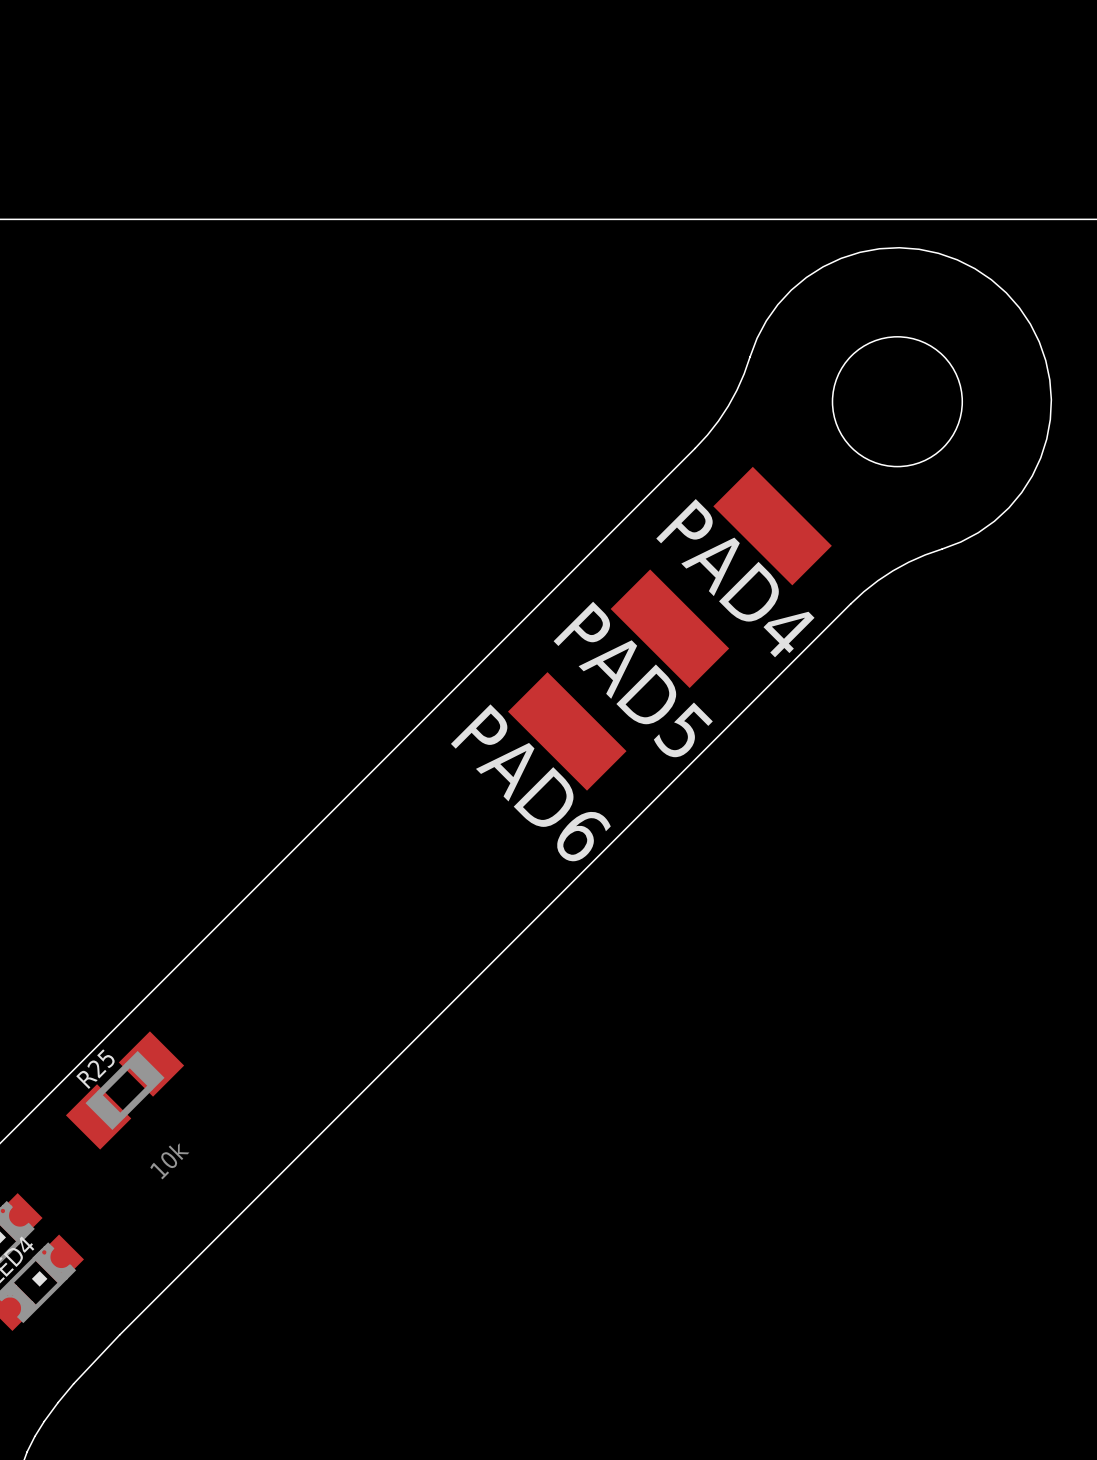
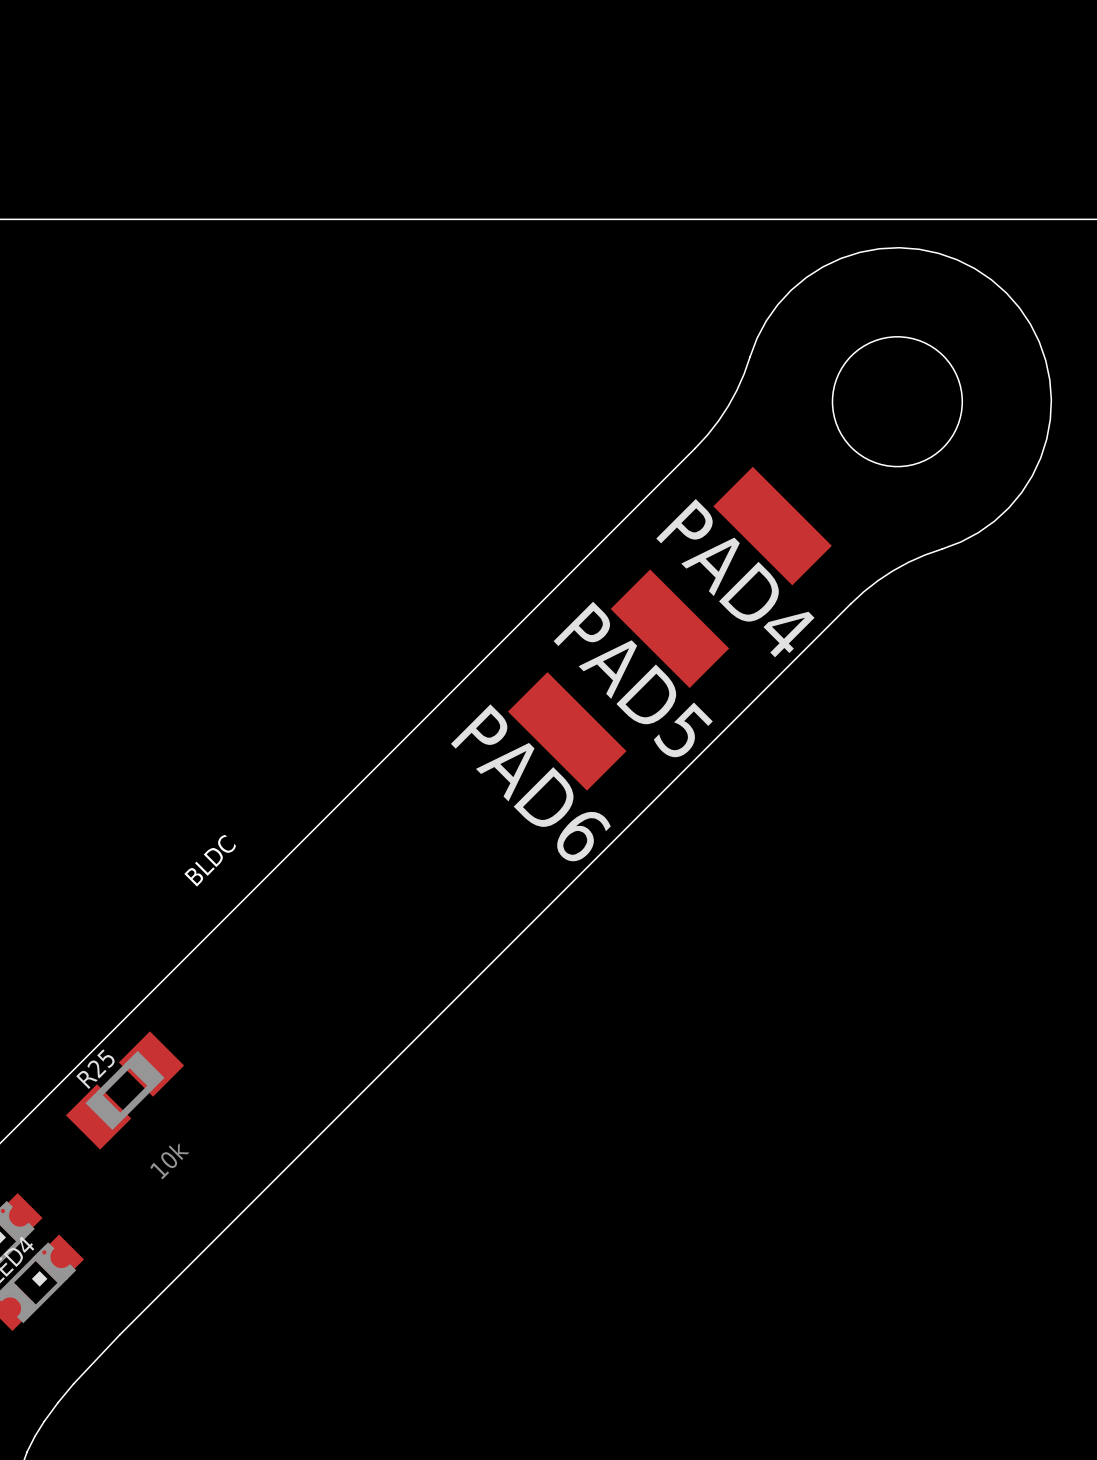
text: none -> BLDC (210, 860)

